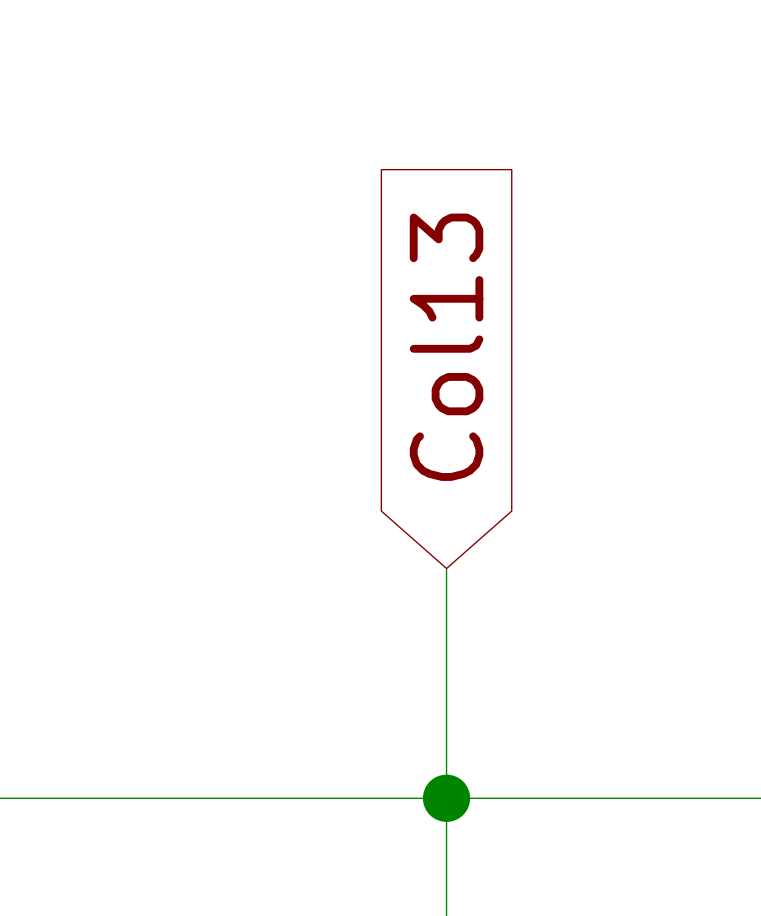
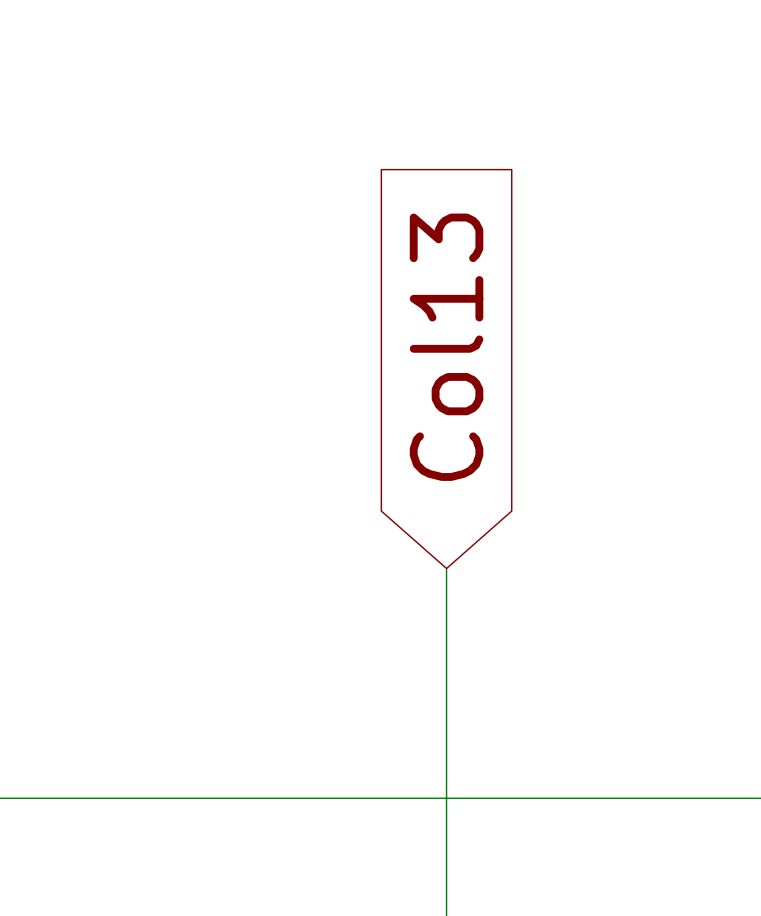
junction: (446, 798) -> none

